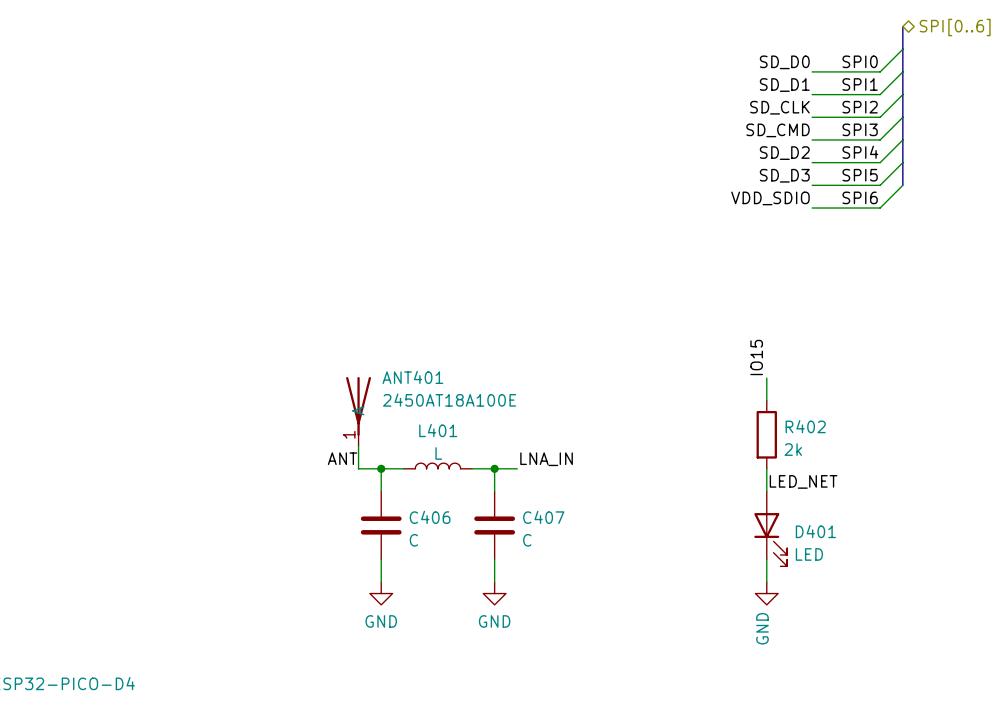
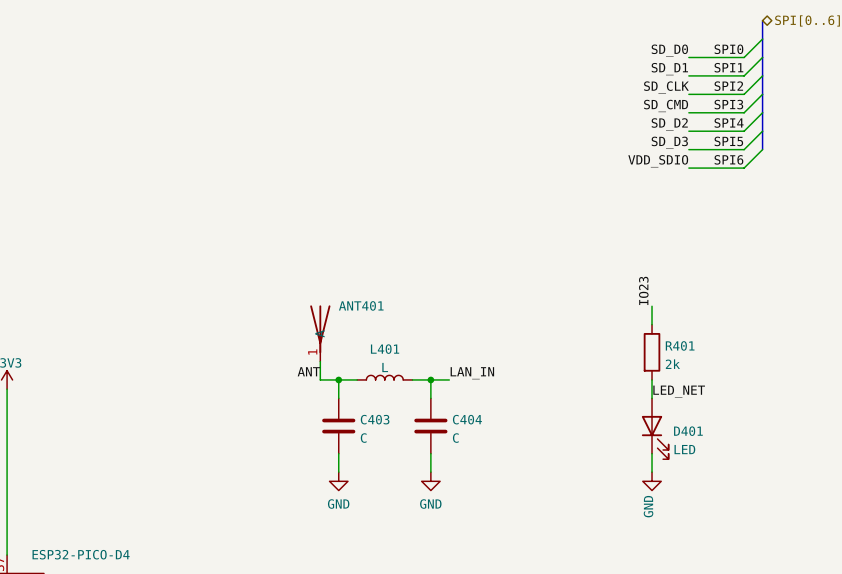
label: IO15 (756, 357) -> IO23 (643, 290)
ANT401 value: 2450AT18A100E (449, 400) -> none
R402 name: R402 (805, 426) -> R401 (680, 345)
label: LNA_IN (546, 459) -> LAN_IN (472, 373)
C406 name: C406 (430, 517) -> C403 (375, 419)
C407 name: C407 (543, 517) -> C404 (467, 419)

